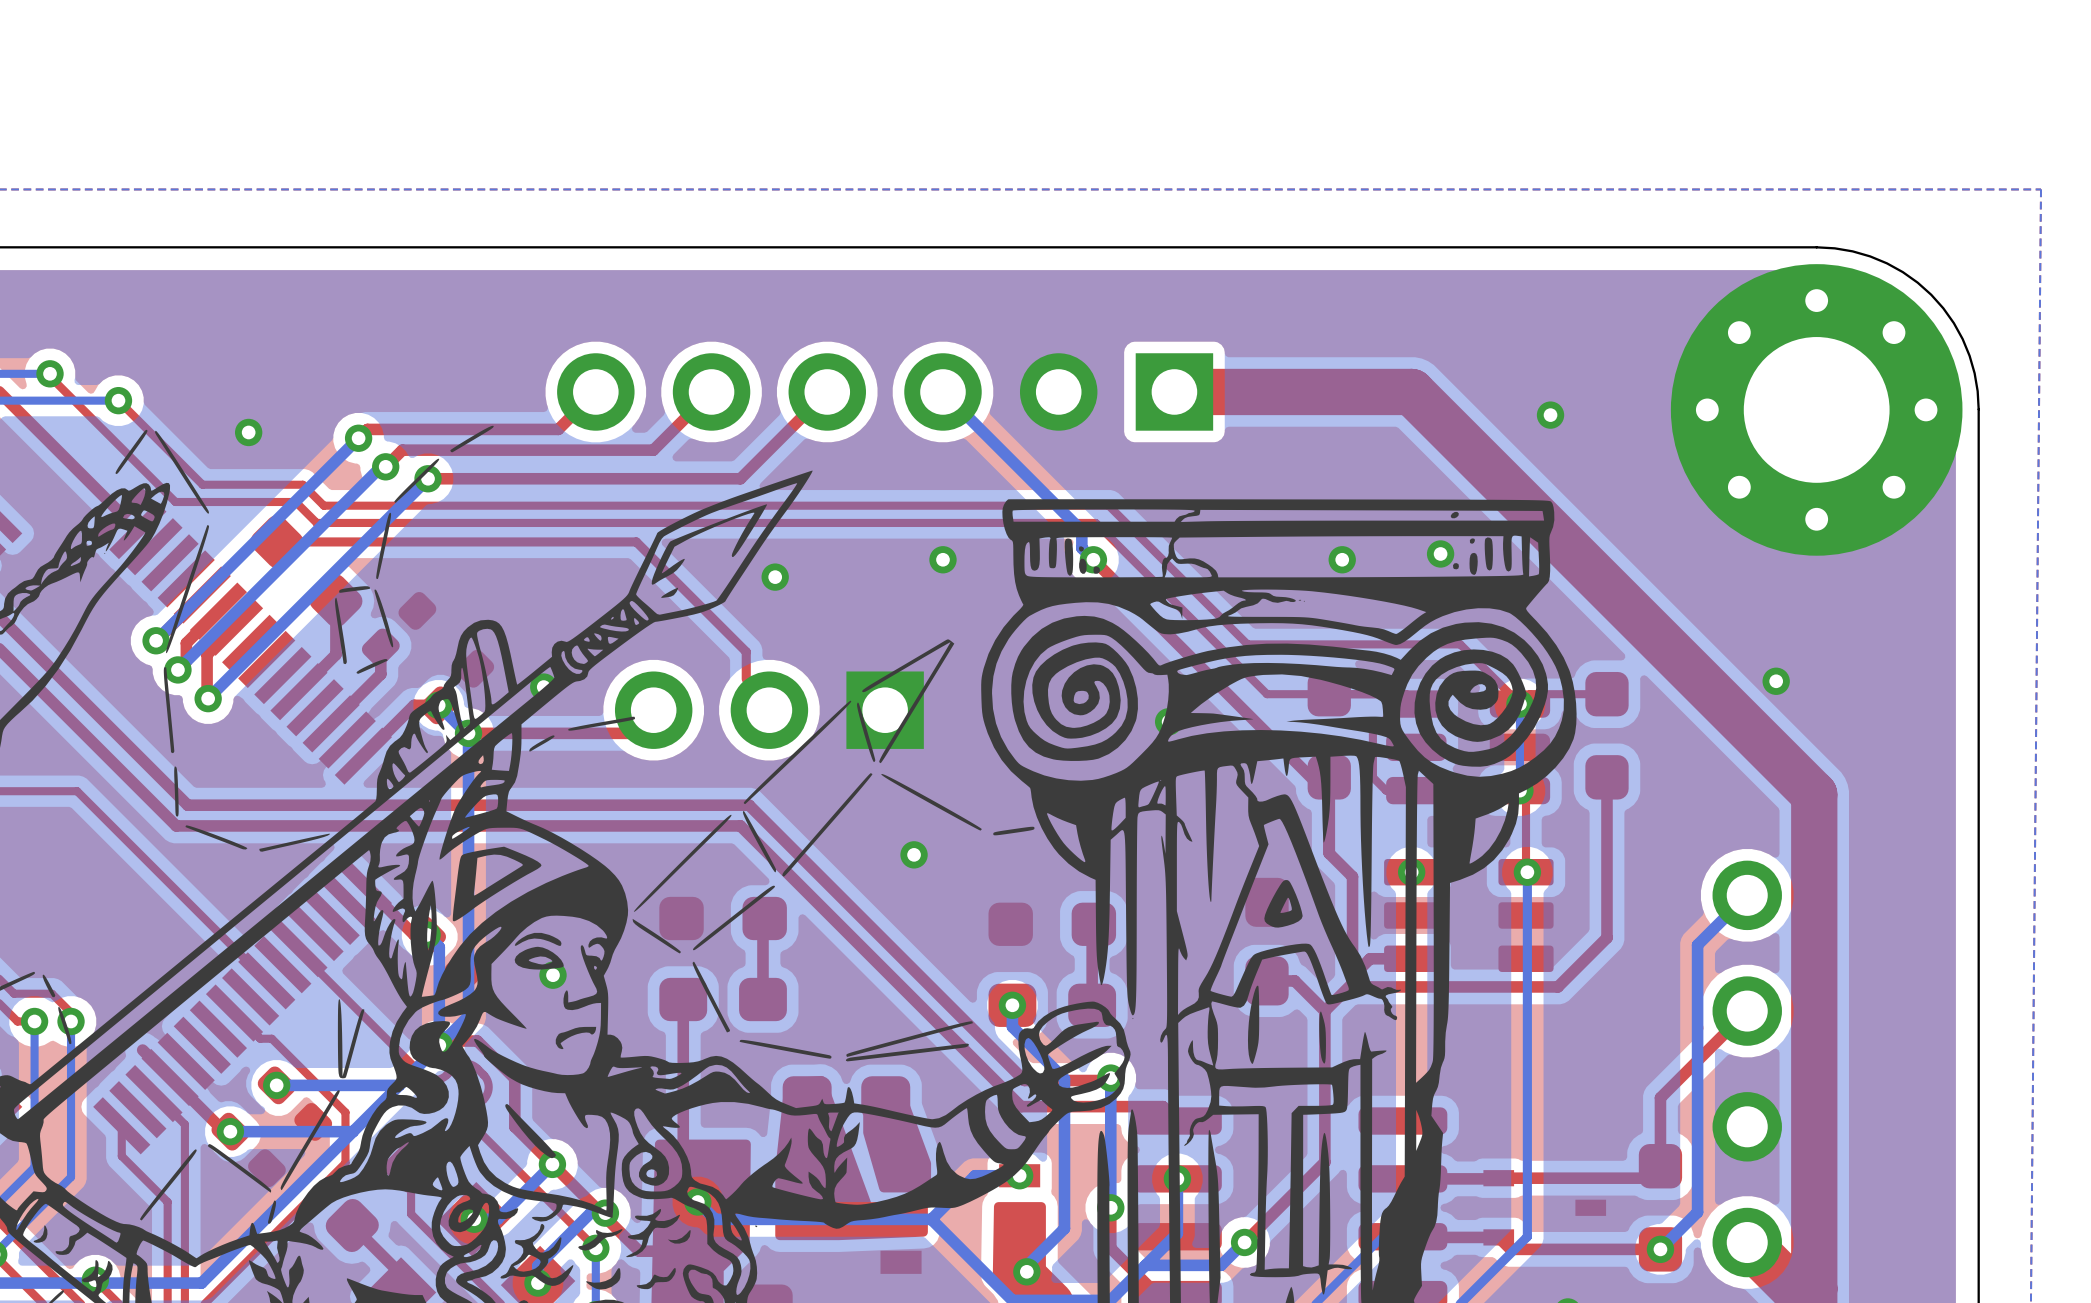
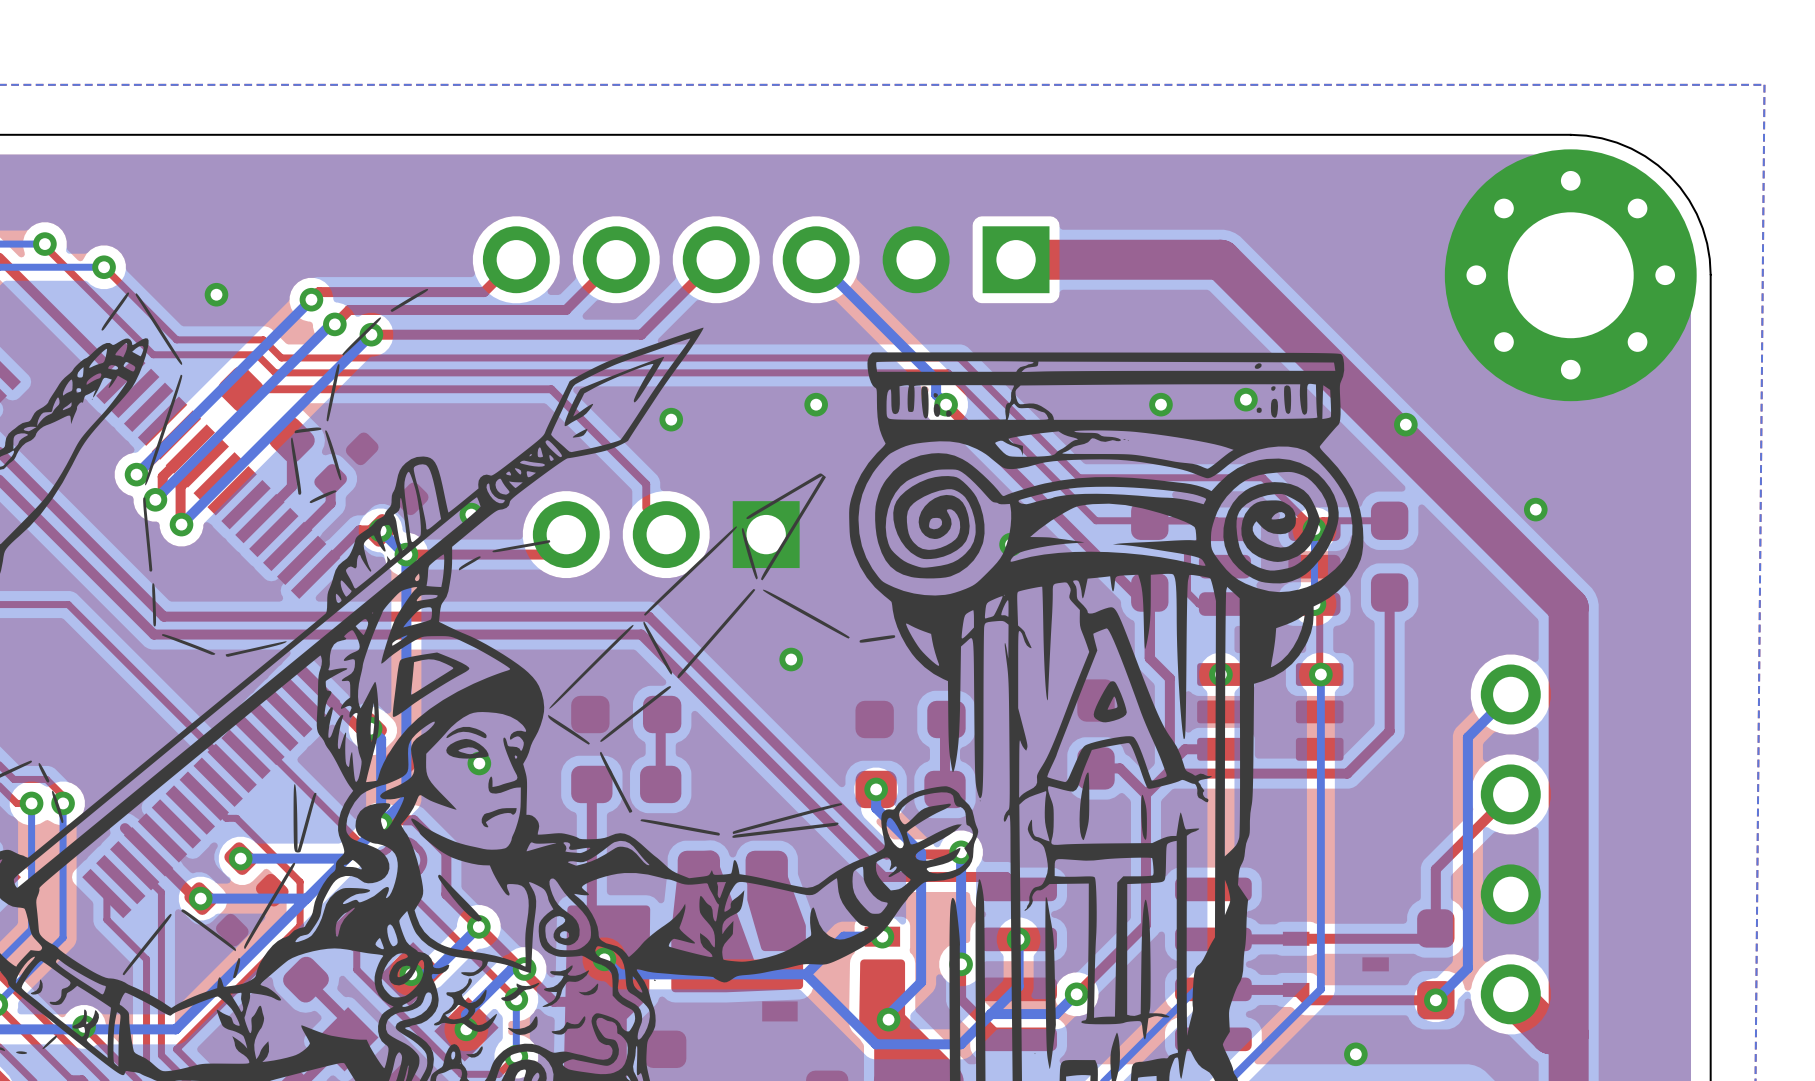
via position: (1550, 415) -> (1405, 424)

